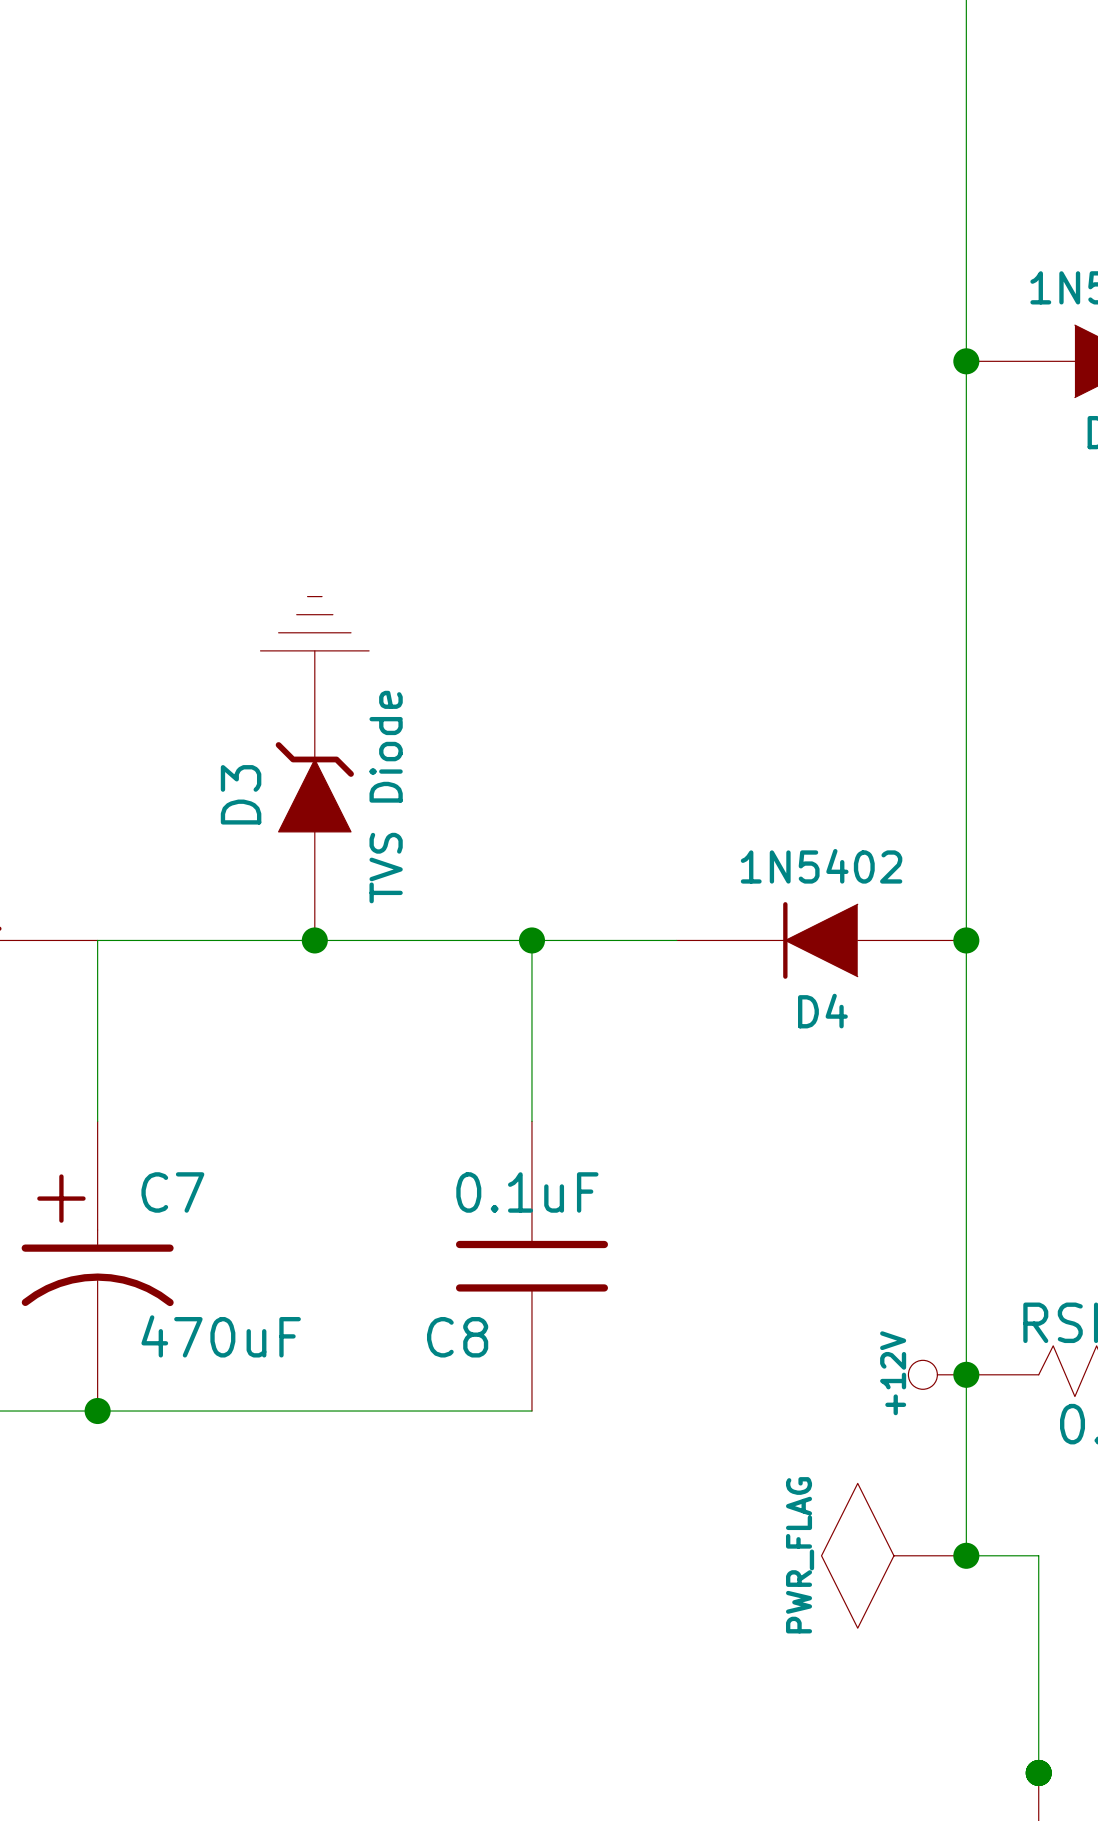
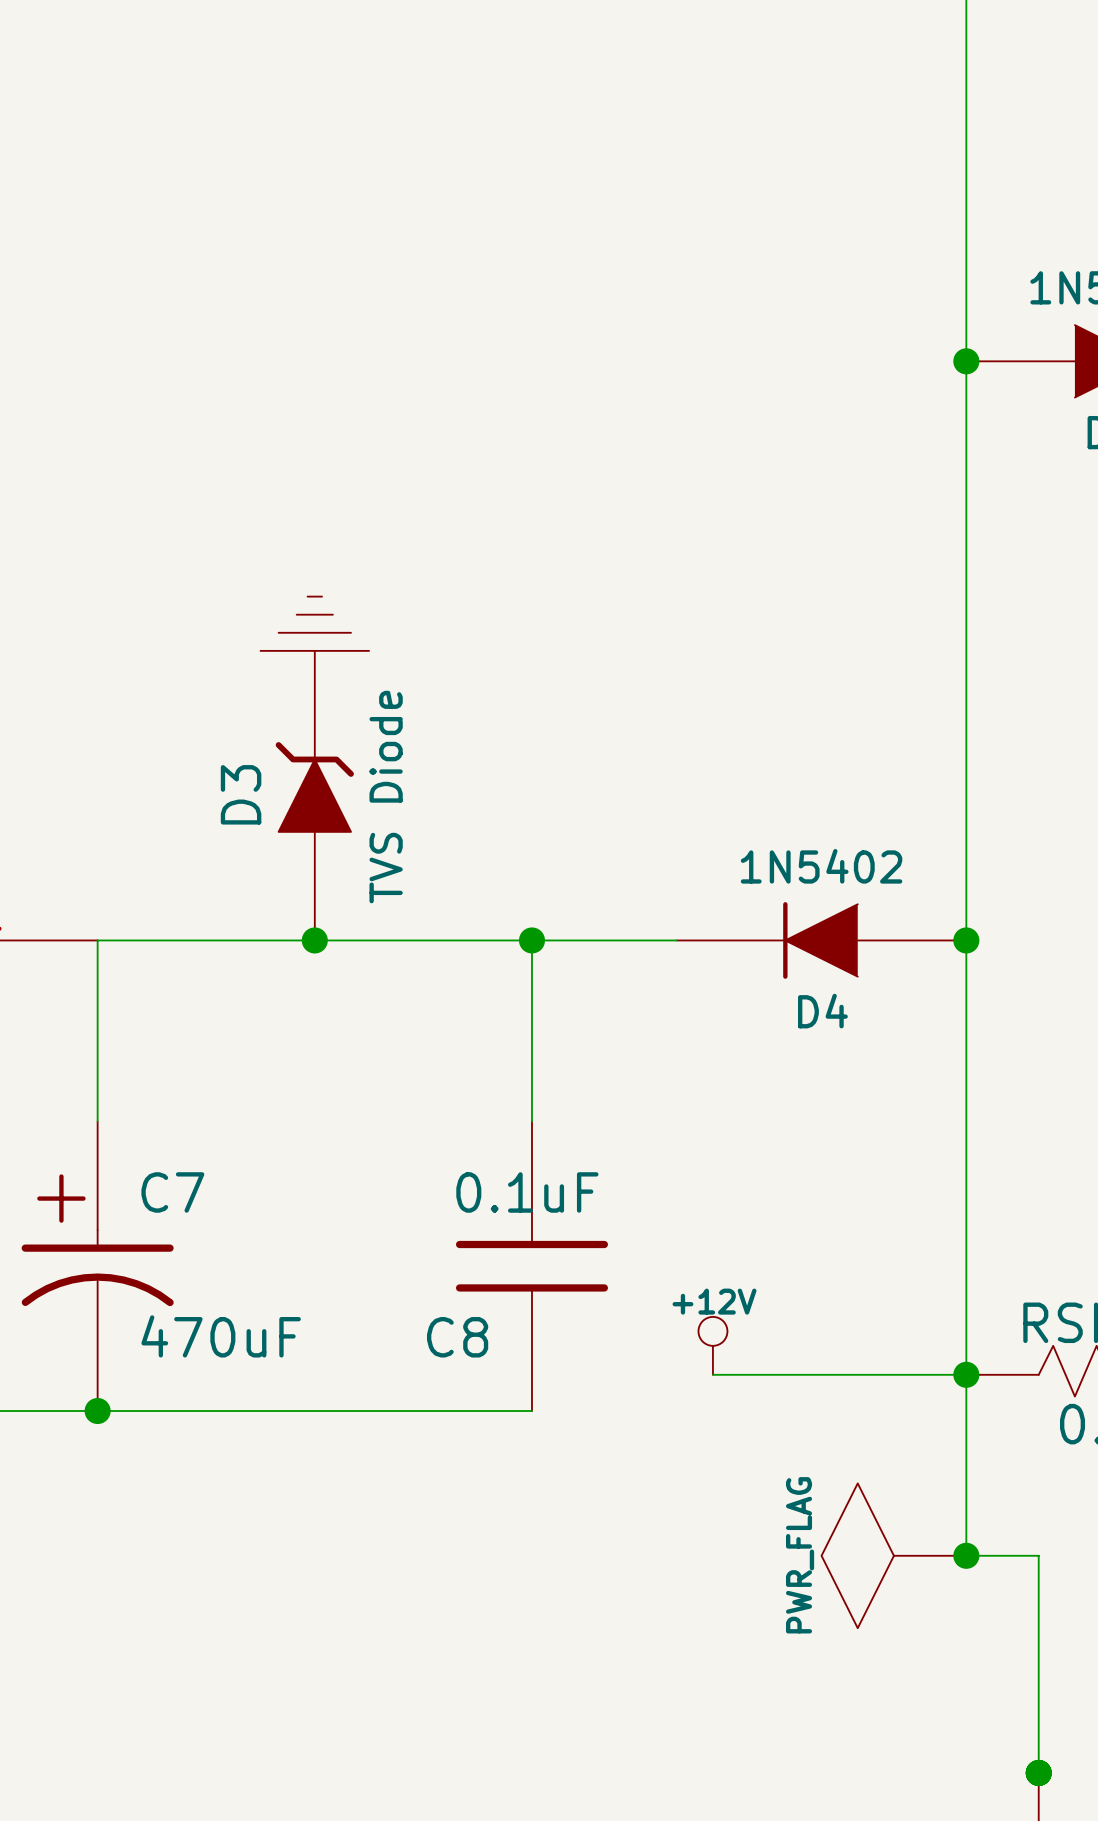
wire: none -> (712, 1374) (966, 1374)
power symbol rotation: 0° (937, 1374) -> 90° clockwise (712, 1345)
power symbol position: +12V (937, 1374) -> +12V (712, 1345)

